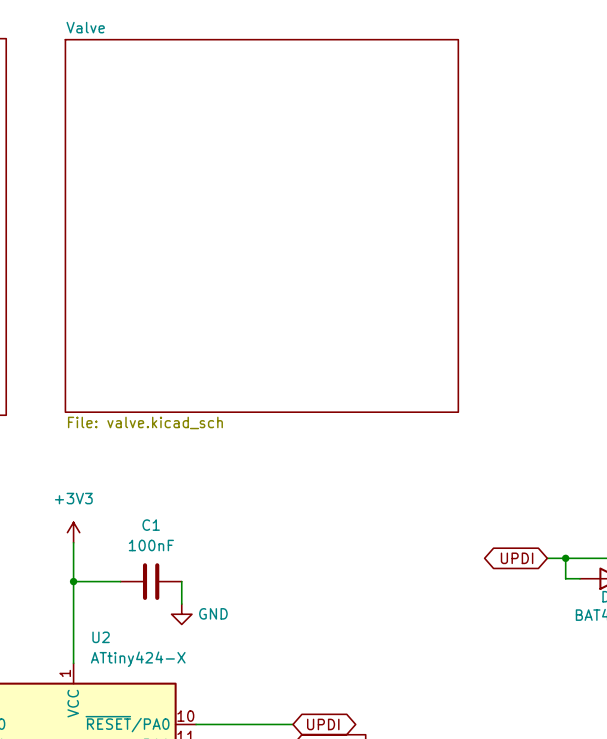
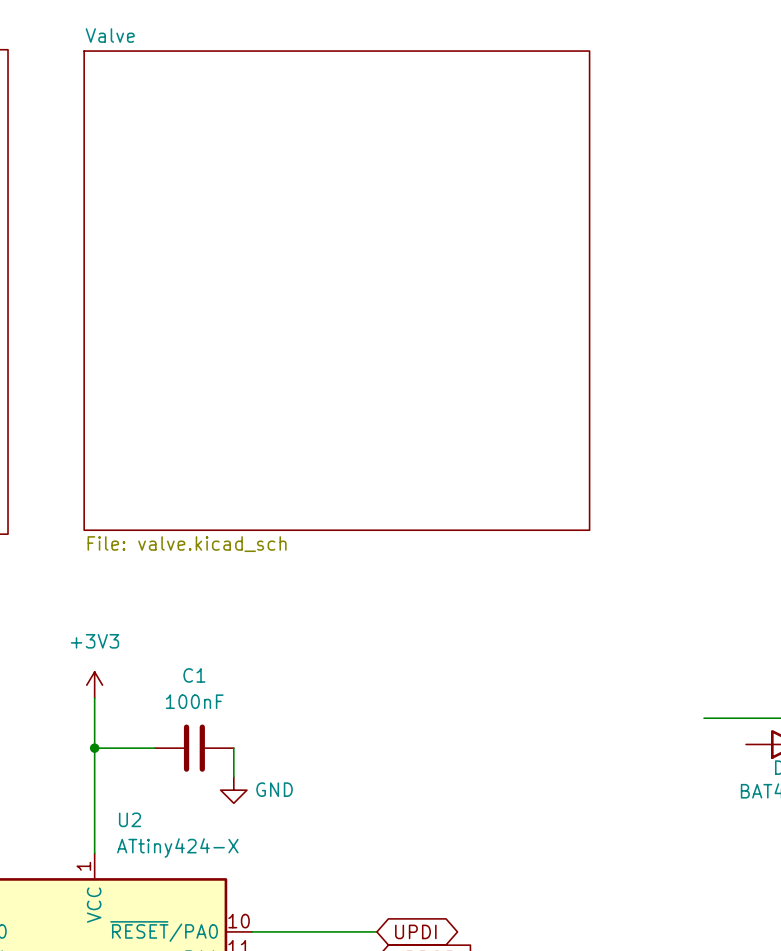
global label: UPDI (517, 558) -> none
wire: (565, 558) (565, 578) (579, 578) -> none
junction: (565, 558) -> none

